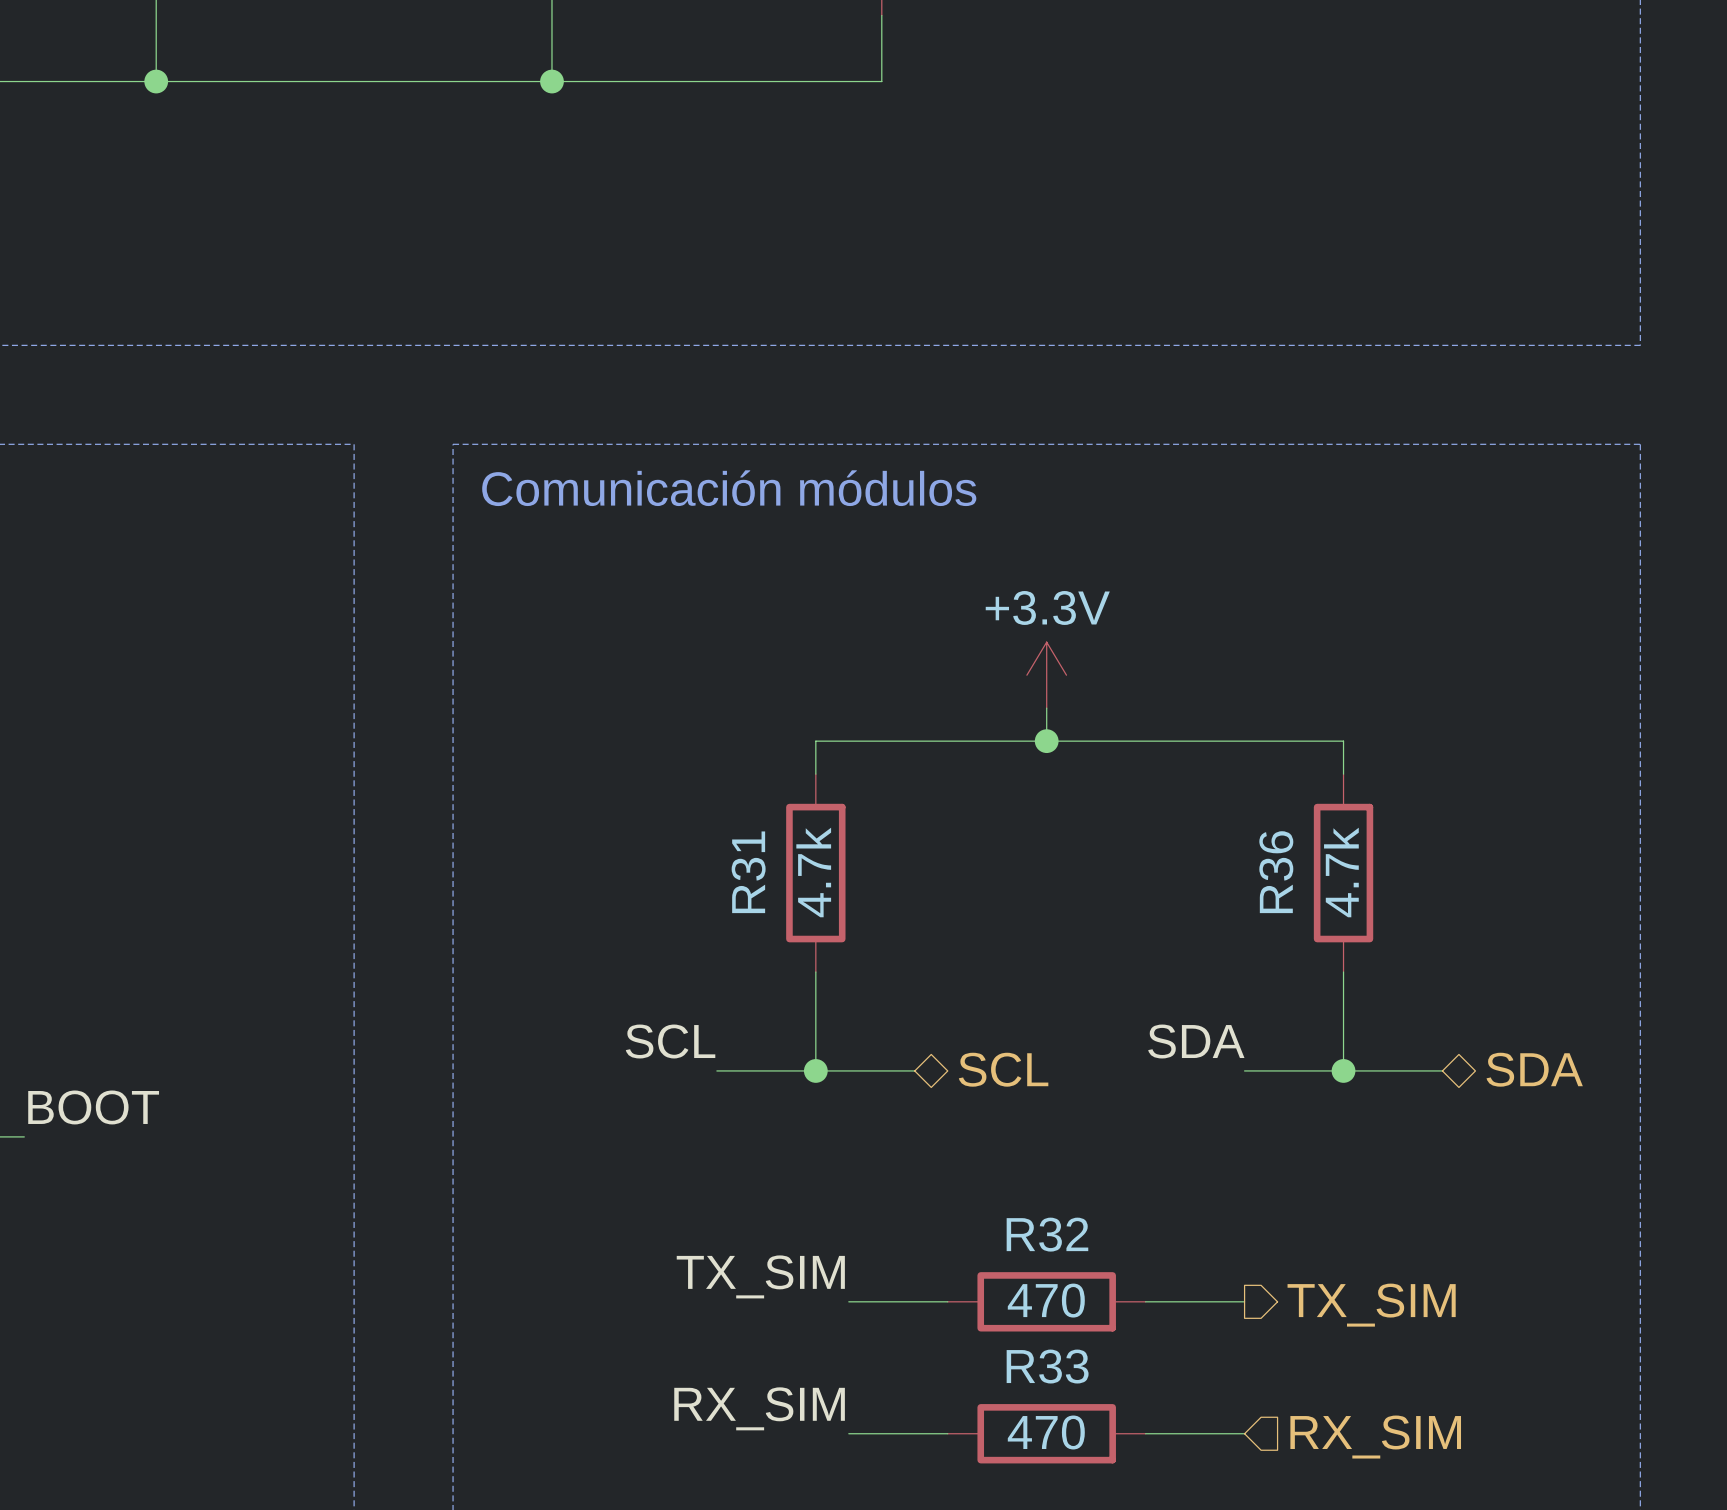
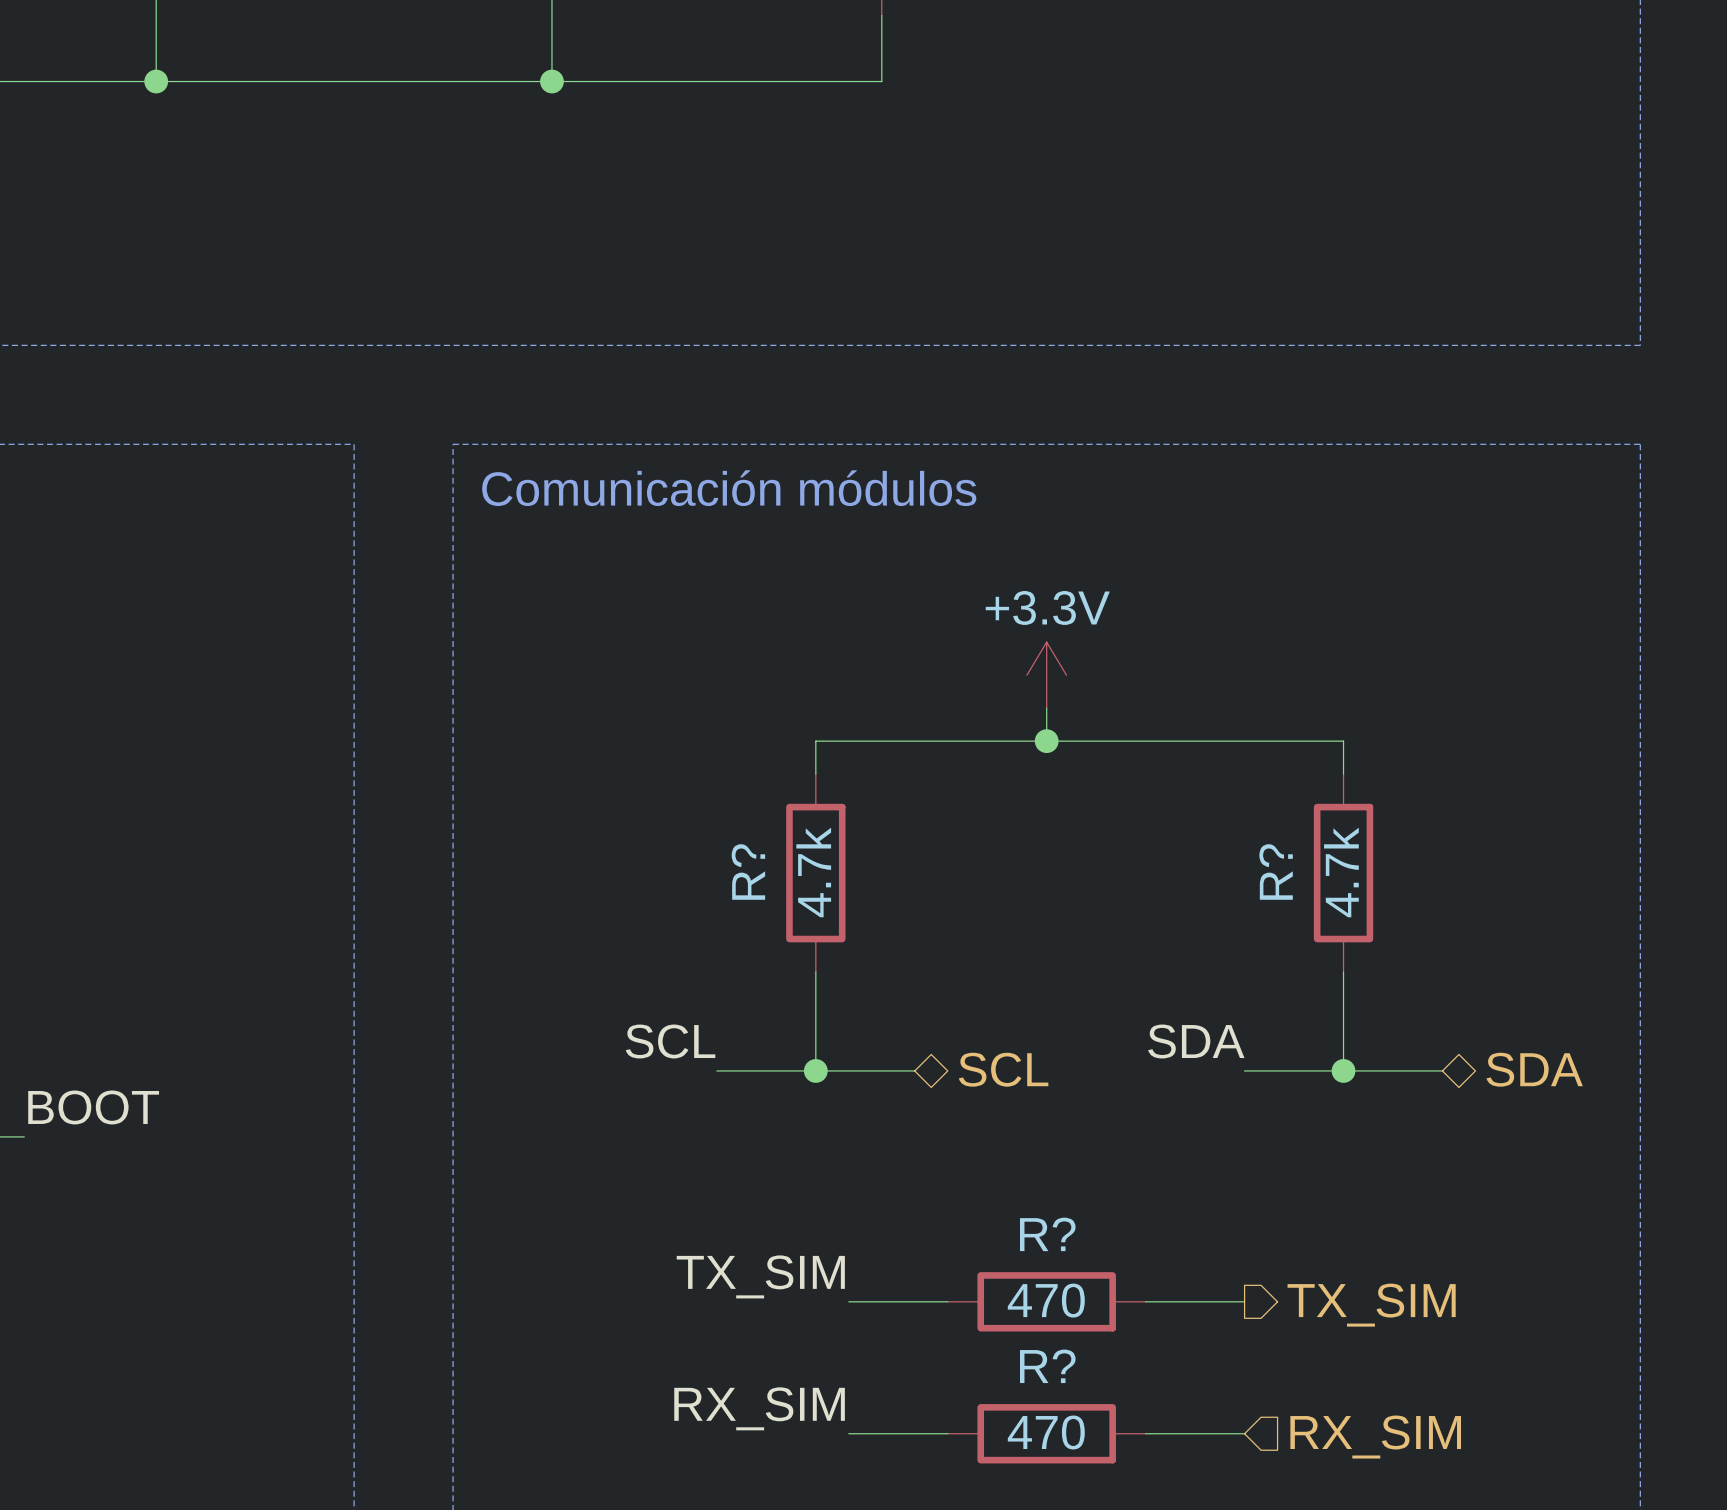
R31 name: R31 (748, 872) -> R? (748, 871)
R36 name: R36 (1276, 872) -> R? (1276, 871)
R32 name: R32 (1047, 1234) -> R? (1047, 1234)
R33 name: R33 (1047, 1366) -> R? (1047, 1366)

